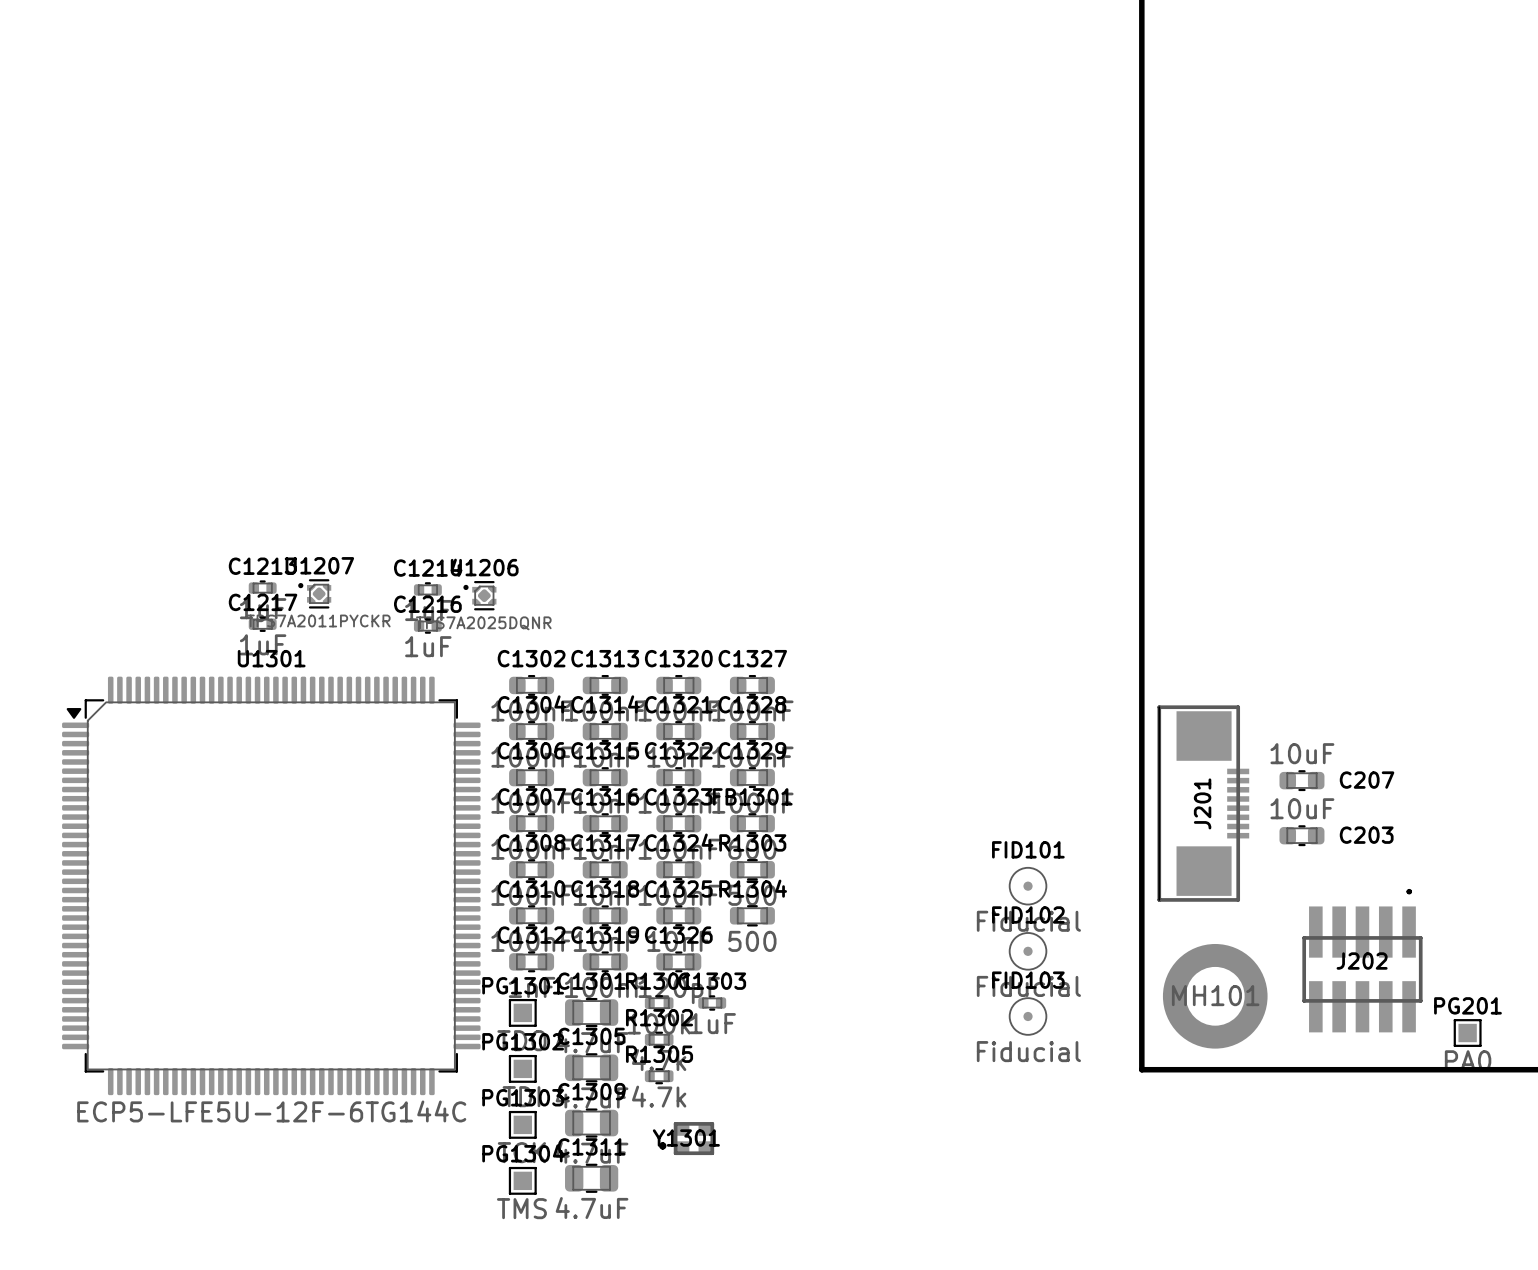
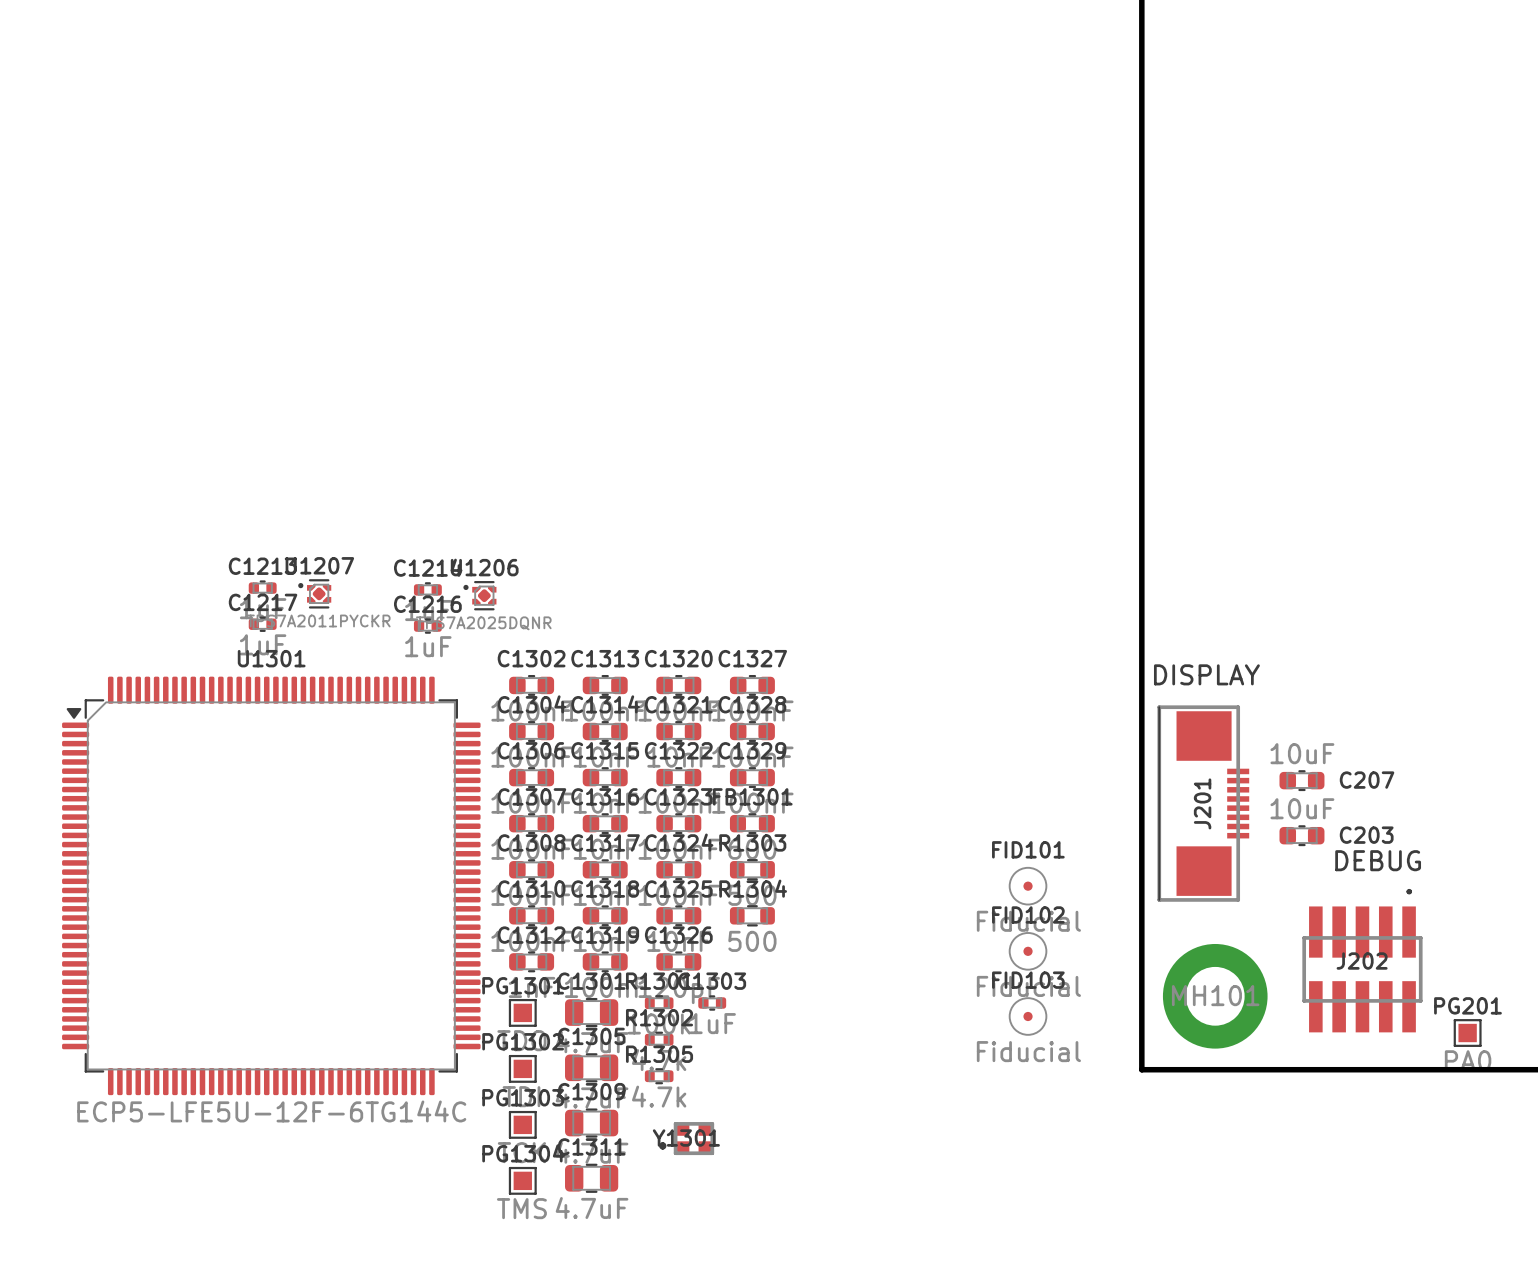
J201 text: none -> DISPLAY (1206, 674)
J202 text: none -> DEBUG (1378, 860)

